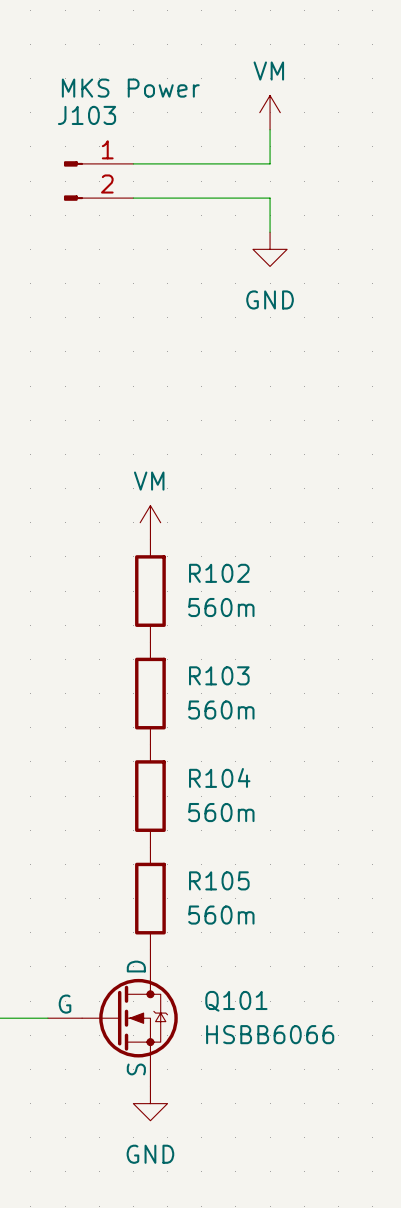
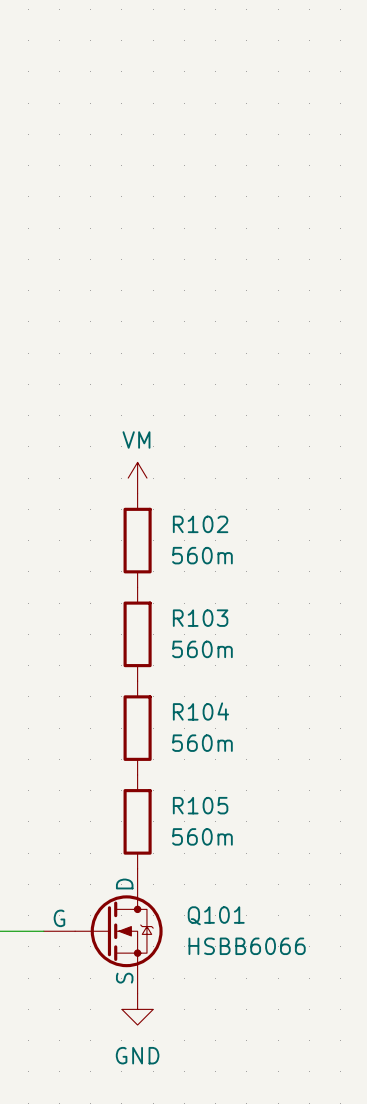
power symbol: VM (270, 112) -> none
wire: (270, 129) (270, 163) (133, 163) -> none
J103: MKS Power (98, 181) -> none
wire: (133, 198) (270, 198) (270, 232) -> none
power symbol: GND (270, 249) -> none

